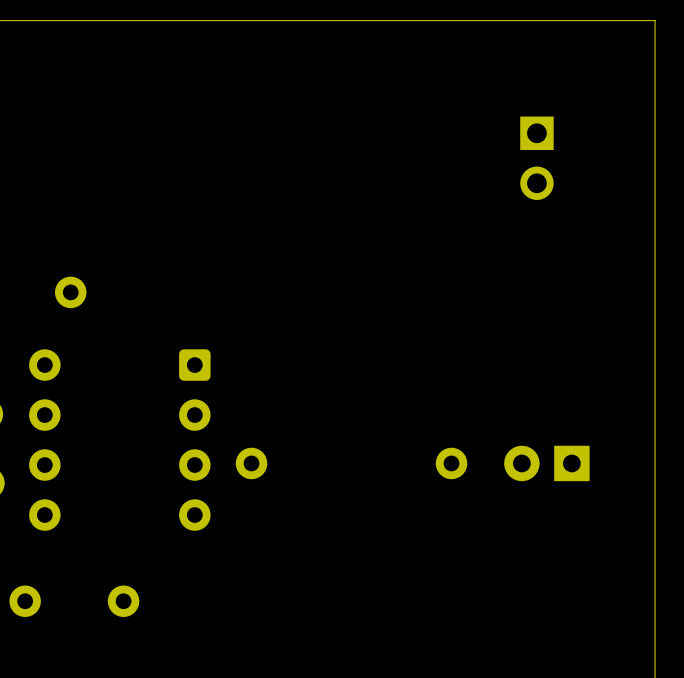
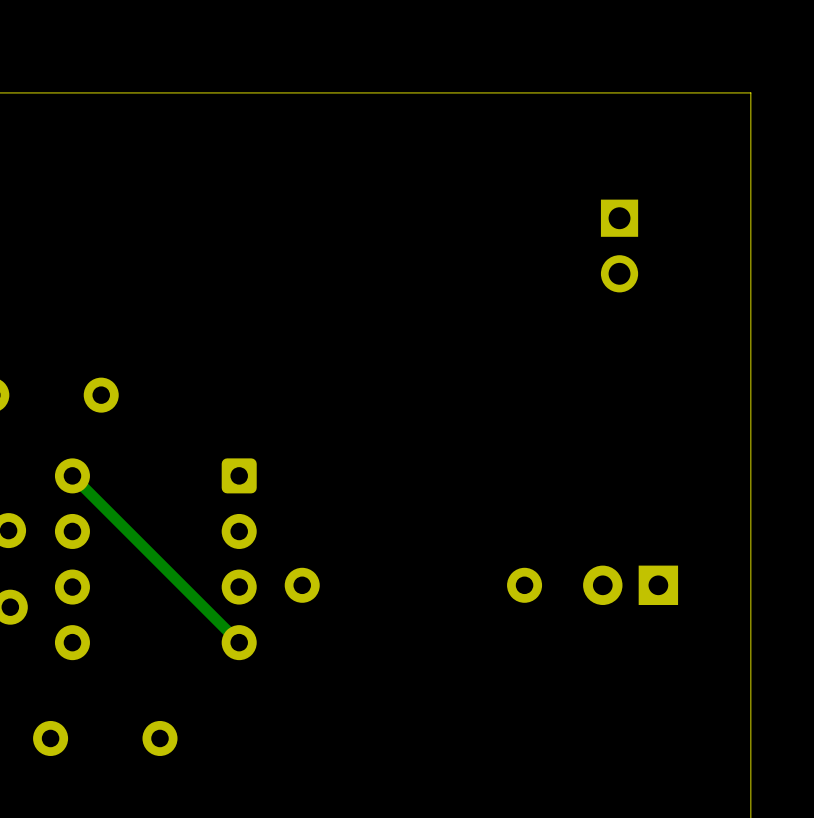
track: none -> (72, 475) (239, 642)

